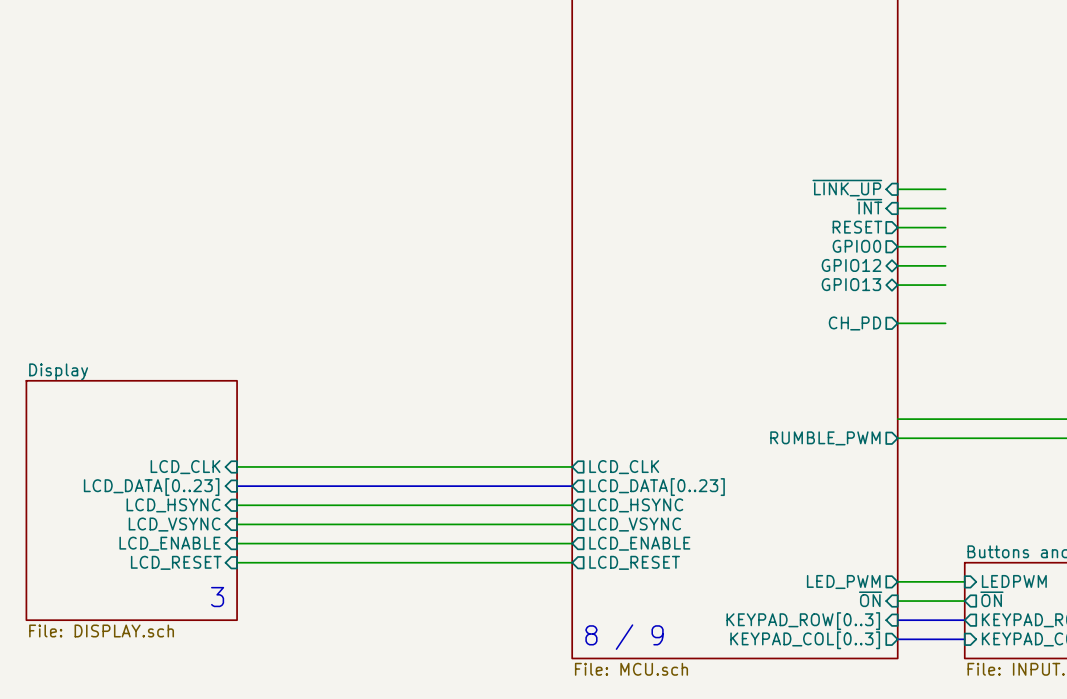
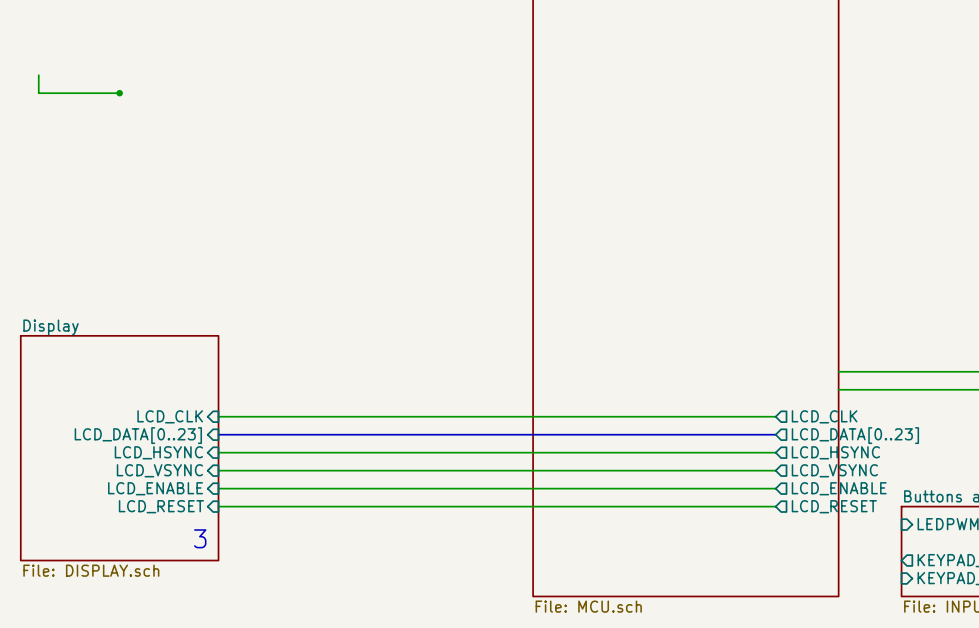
wire: none -> (38, 75) (38, 93) (119, 93)
junction: none -> (119, 93)
sheet pin: ~{LINK_UP} (847, 188) -> none
wire: (897, 189) (945, 189) -> none
sheet pin: ~{INT} (869, 206) -> none
wire: (897, 208) (945, 208) -> none
sheet pin: RESET (857, 227) -> none
wire: (897, 227) (945, 227) -> none
sheet pin: GPIO0 (856, 246) -> none
wire: (897, 246) (945, 246) -> none
sheet pin: GPIO12 (851, 265) -> none
wire: (897, 265) (945, 265) -> none
sheet pin: GPIO13 (851, 284) -> none
wire: (897, 285) (945, 285) -> none
sheet pin: CH_PD (854, 323) -> none
wire: (897, 323) (945, 323) -> none
sheet pin: RUMBLE_PWM (825, 438) -> none
wire: none -> (533, 416) (775, 416)
sheet pin: LCD_CLK (624, 467) -> none
sheet pin: none -> LCD_CLK (824, 416)
bus: none -> (533, 434) (775, 434)
sheet pin: LCD_DATA[0..23] (657, 487) -> none
sheet pin: none -> LCD_DATA[0..23] (855, 435)
wire: none -> (533, 452) (775, 452)
sheet pin: LCD_HSYNC (636, 505) -> none
sheet pin: none -> LCD_HSYNC (835, 452)
wire: none -> (533, 470) (775, 470)
sheet pin: LCD_VSYNC (635, 524) -> none
sheet pin: none -> LCD_VSYNC (834, 470)
wire: none -> (533, 488) (775, 488)
sheet pin: LCD_ENABLE (639, 543) -> none
sheet pin: none -> LCD_ENABLE (839, 488)
wire: none -> (533, 506) (775, 506)
sheet pin: LCD_RESET (634, 562) -> none
sheet pin: none -> LCD_RESET (834, 506)
sheet pin: LED_PWM (843, 581) -> none
wire: (897, 581) (964, 581) -> none
sheet pin: ~{ON} (870, 599) -> none
sheet pin: ~{ON} (991, 599) -> none
wire: (897, 601) (964, 601) -> none
bus: (897, 620) (964, 620) -> none
sheet pin: KEYPAD_ROW[0..3] (803, 621) -> none
text: 8 / 9 (624, 637) -> none
bus: (897, 639) (964, 639) -> none
sheet pin: KEYPAD_COL[0..3] (805, 640) -> none

